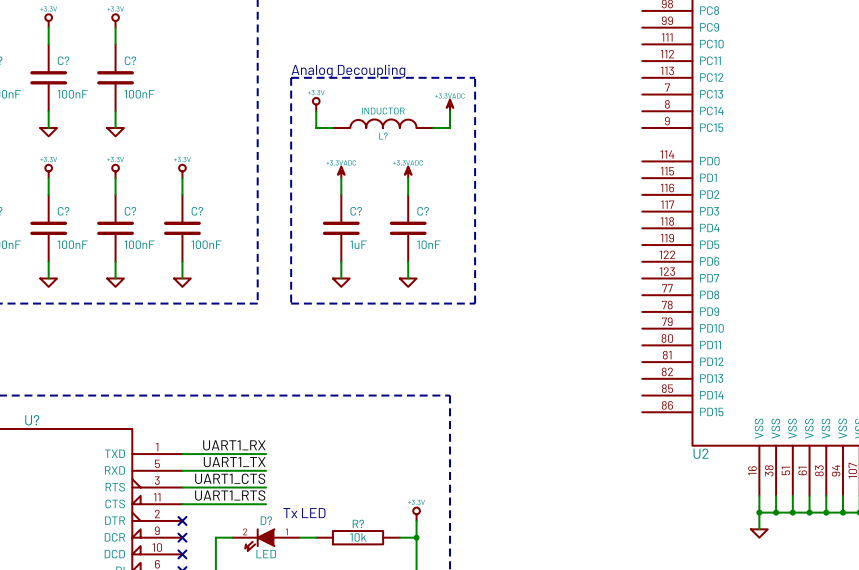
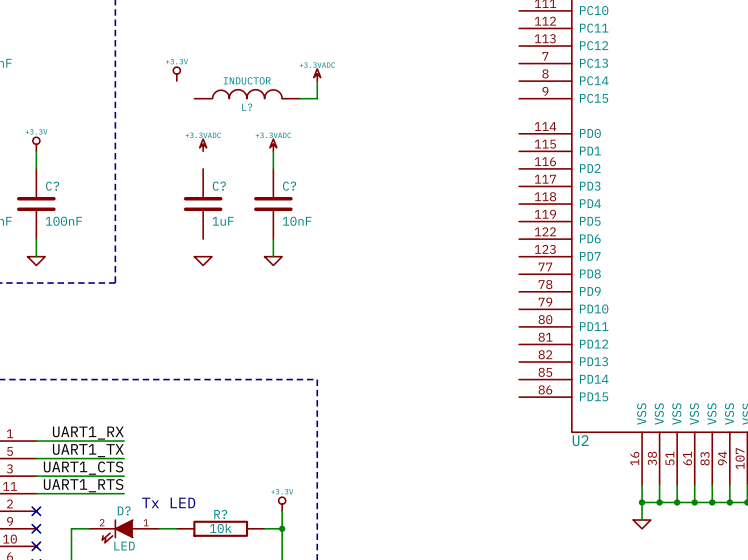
text: Analog Decoupling (348, 71) -> none
line: (291, 77) (475, 77) (475, 303) (291, 303) (291, 77) -> none
wire: (316, 111) (316, 127) (332, 127) -> none
wire: (341, 178) (341, 194) -> none
wire: (341, 261) (341, 278) -> none

